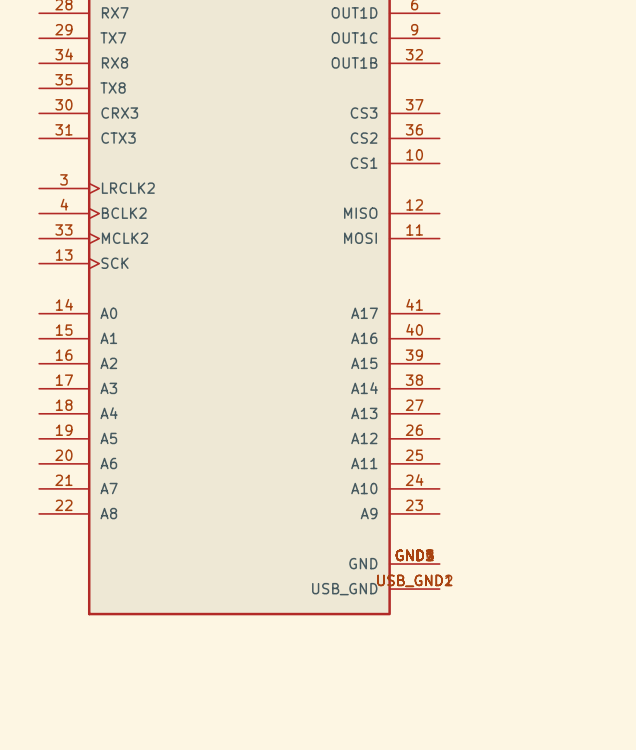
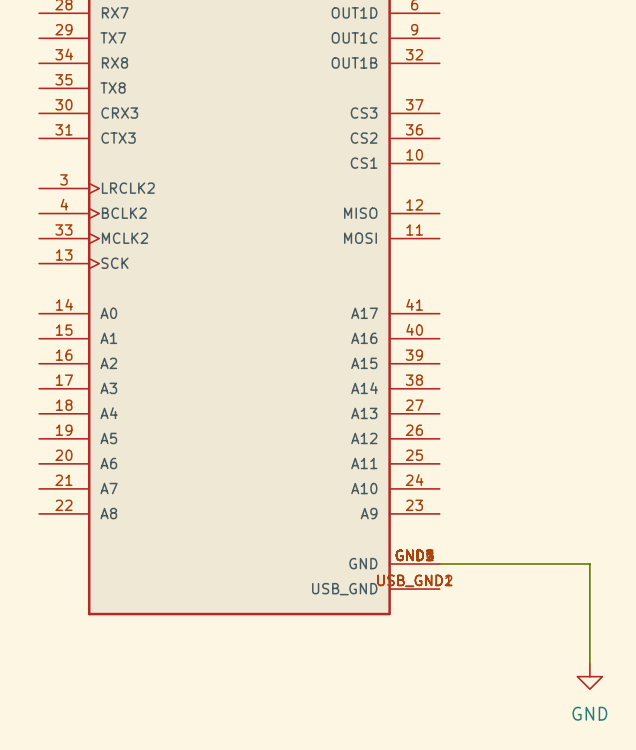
wire: none -> (439, 564) (589, 564) (589, 664)
power symbol: none -> GND (589, 676)

